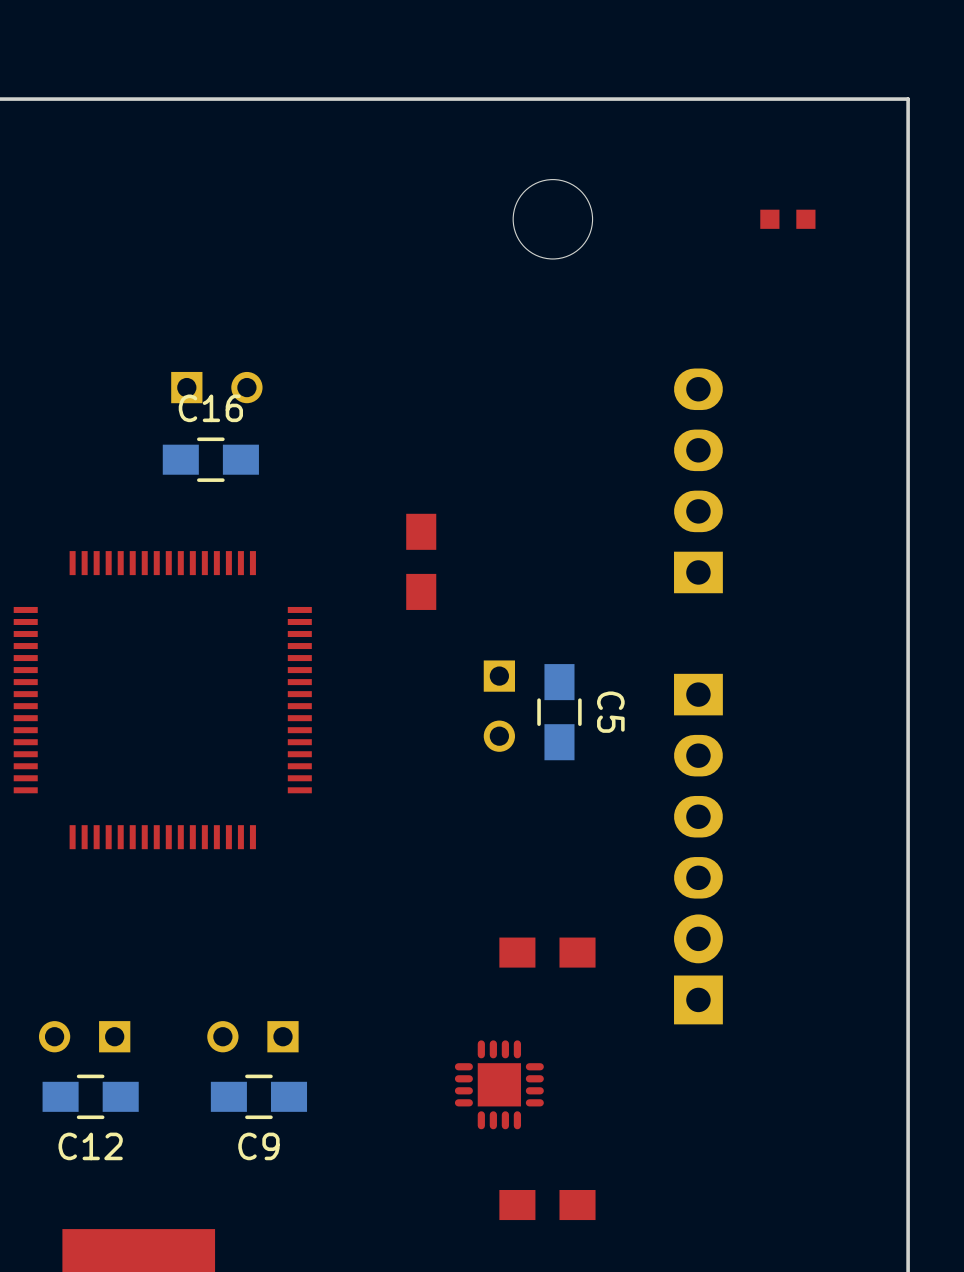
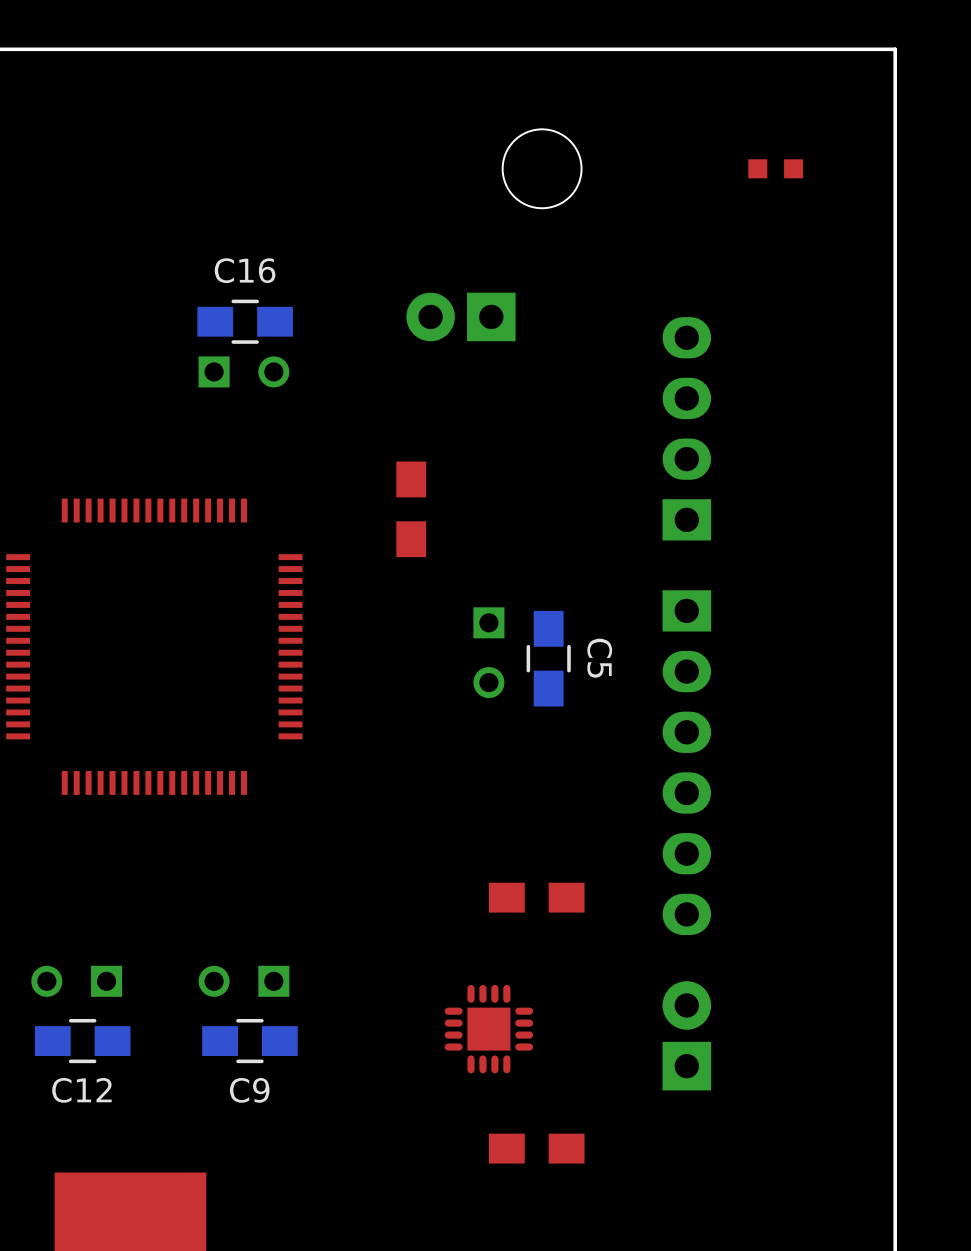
part: none -> (460, 316)
part position: (216, 387) -> (243, 371)
C16 position: (210, 459) -> (245, 321)
part: (698, 786) -> none
part: none -> (686, 762)
part position: (698, 969) -> (686, 1035)

